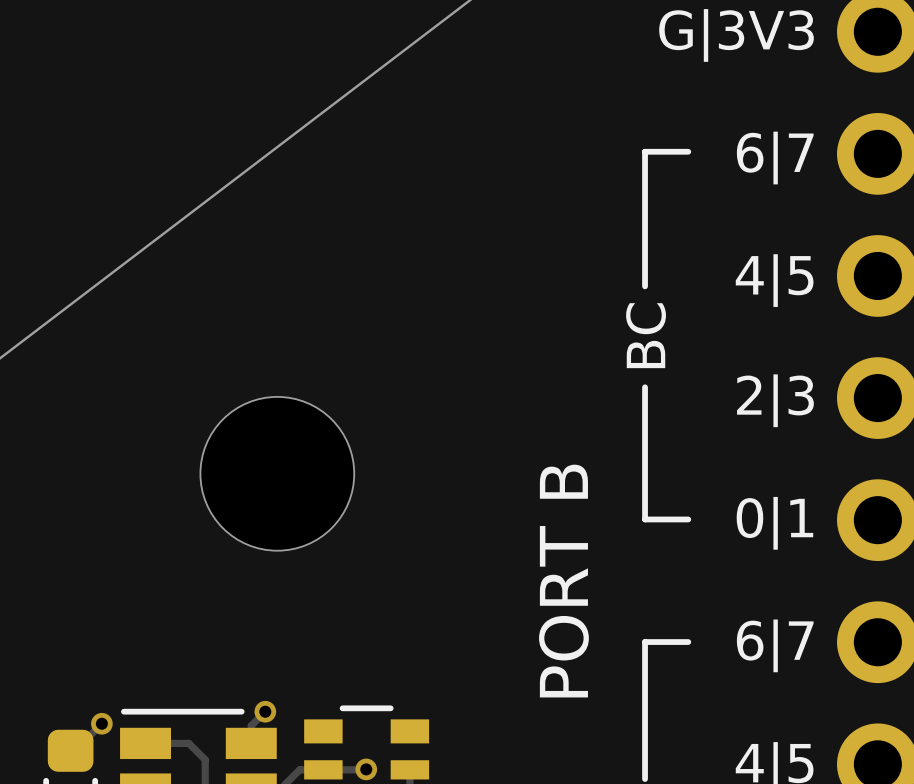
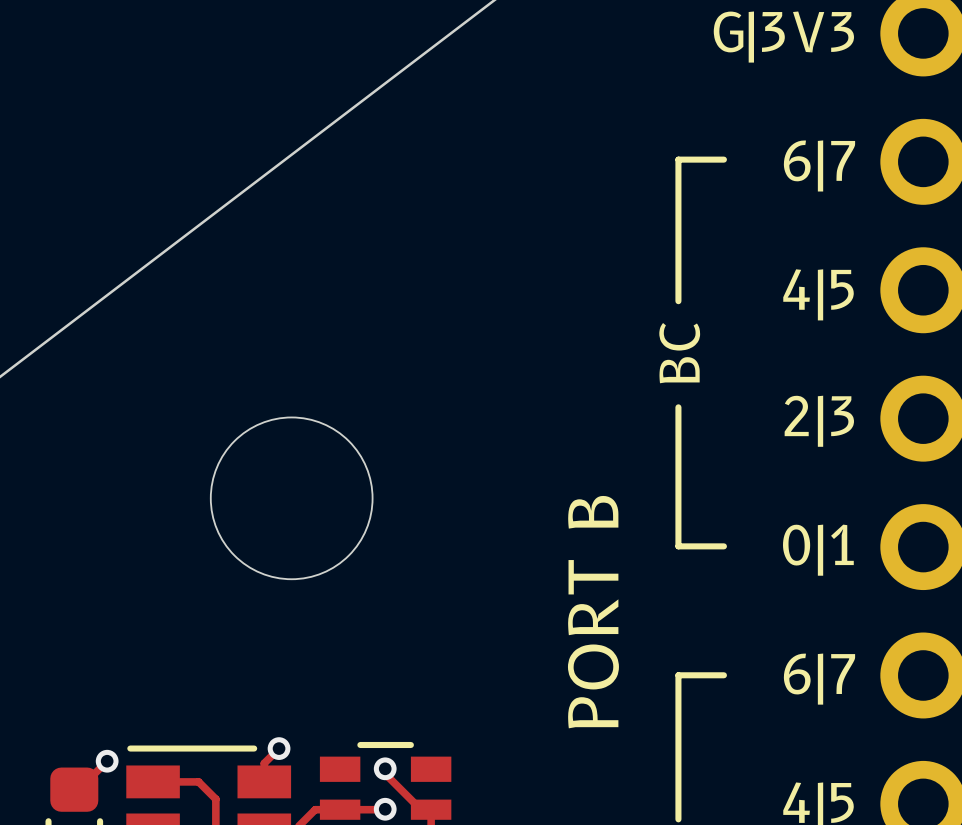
track: none -> (385, 768) (385, 773) (421, 809) (431, 809)
via: none -> (385, 768)

